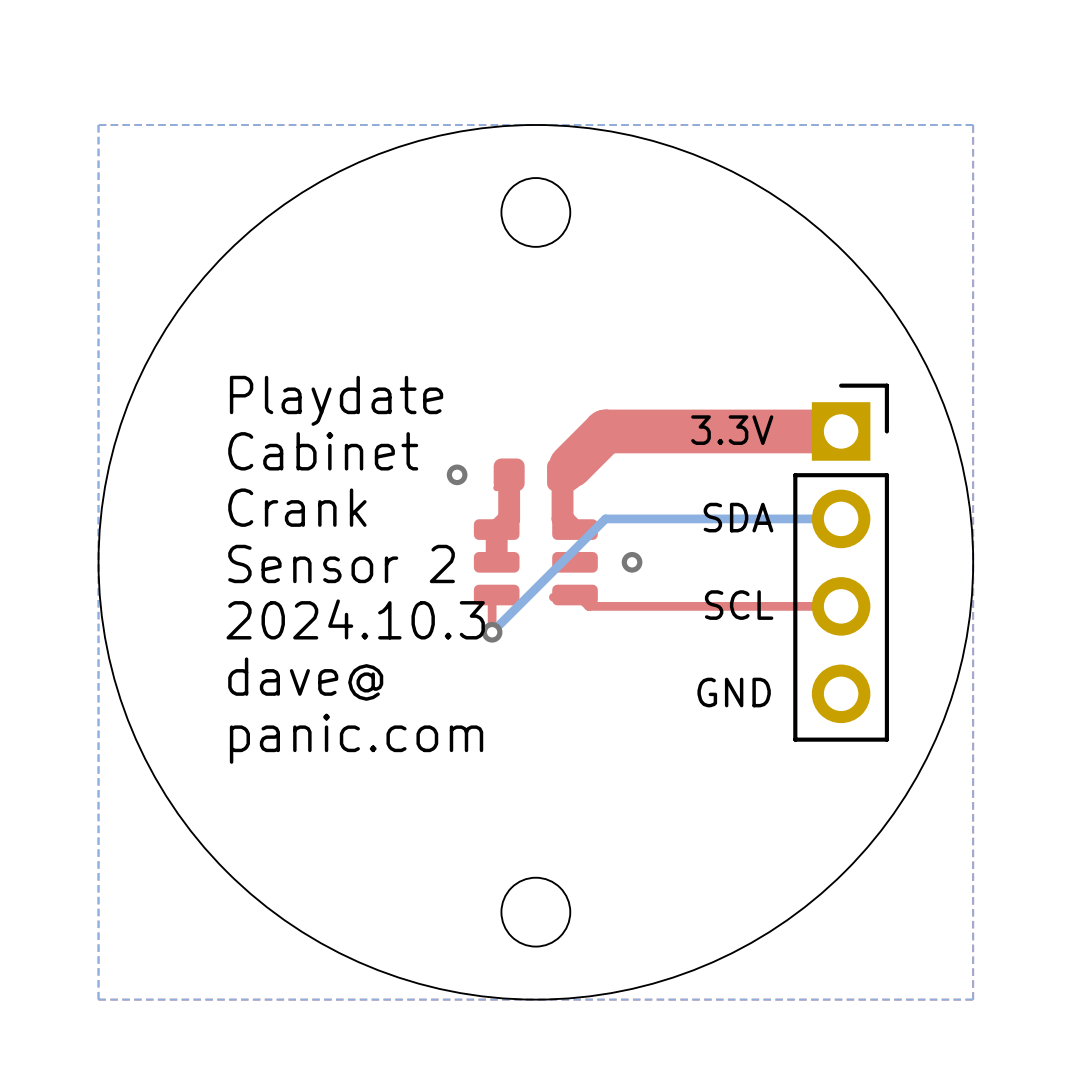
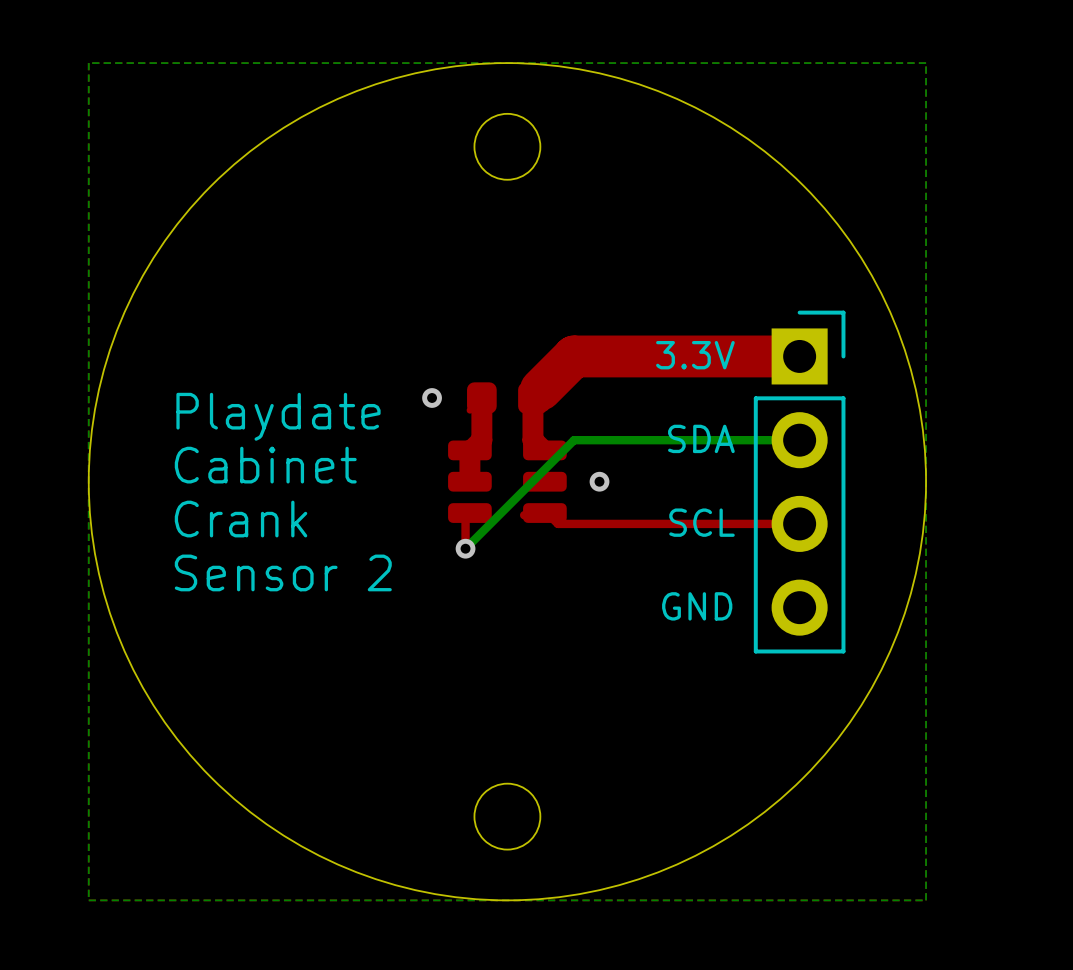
text position: Playdate (336, 400) -> Playdate (278, 416)
text position: Cabinet (323, 451) -> Cabinet (265, 465)
text position: Crank (297, 507) -> Crank (241, 519)
text position: Sensor 2 (341, 563) -> Sensor 2 (283, 572)
text: 2024.10.3 (355, 619) -> none
text: dave@ (305, 679) -> none
text: panic.com (356, 738) -> none

